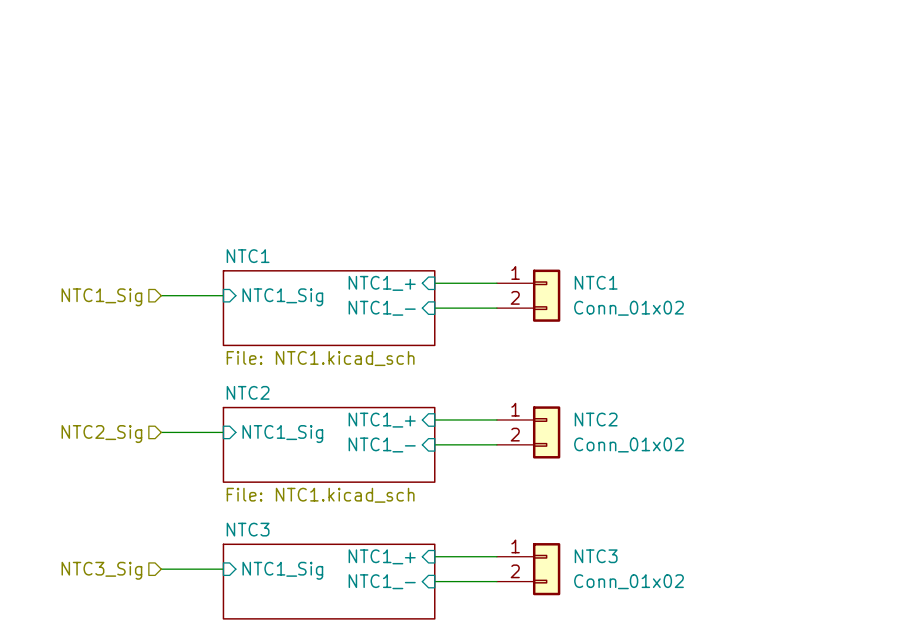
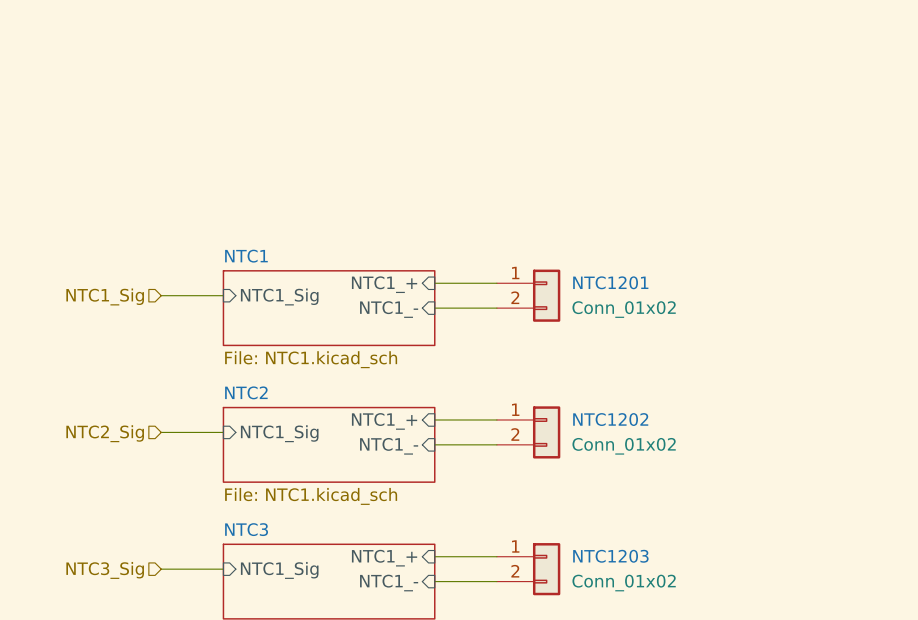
NTC1 name: NTC1 (596, 282) -> NTC1201 (610, 282)
NTC2 name: NTC2 (596, 419) -> NTC1202 (610, 419)
NTC3 name: NTC3 (596, 556) -> NTC1203 (610, 556)

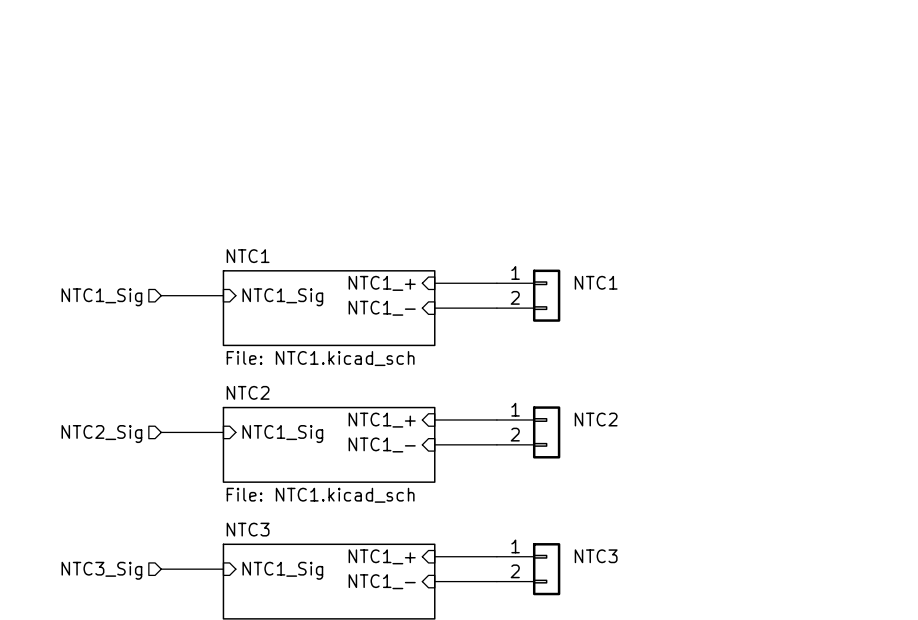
NTC1201 name: NTC1201 (610, 282) -> NTC1 (596, 282)
NTC1201 value: Conn_01x02 (624, 309) -> none
NTC1202 name: NTC1202 (610, 419) -> NTC2 (596, 419)
NTC1202 value: Conn_01x02 (624, 446) -> none
NTC1203 name: NTC1203 (610, 556) -> NTC3 (596, 556)
NTC1203 value: Conn_01x02 (624, 583) -> none

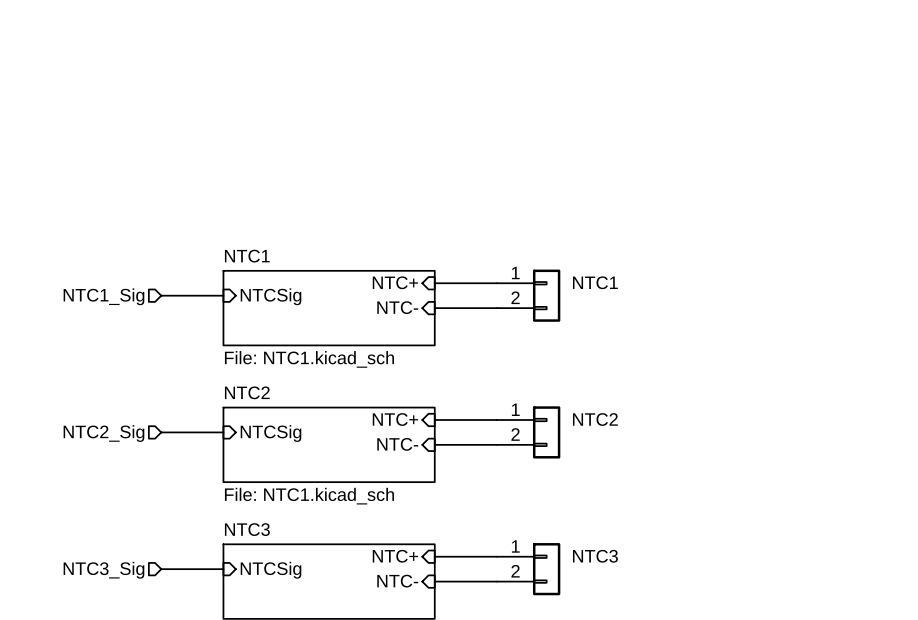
sheet pin: NTC1_+ (382, 283) -> NTC+ (395, 282)
sheet pin: NTC1_Sig (282, 297) -> NTCSig (271, 296)
sheet pin: NTC1_- (382, 308) -> NTC- (397, 307)
sheet pin: NTC1_+ (382, 420) -> NTC+ (395, 419)
sheet pin: NTC1_Sig (282, 434) -> NTCSig (271, 433)
sheet pin: NTC1_- (382, 444) -> NTC- (397, 444)
sheet pin: NTC1_+ (382, 556) -> NTC+ (395, 556)
sheet pin: NTC1_Sig (282, 570) -> NTCSig (271, 570)
sheet pin: NTC1_- (382, 581) -> NTC- (397, 581)

